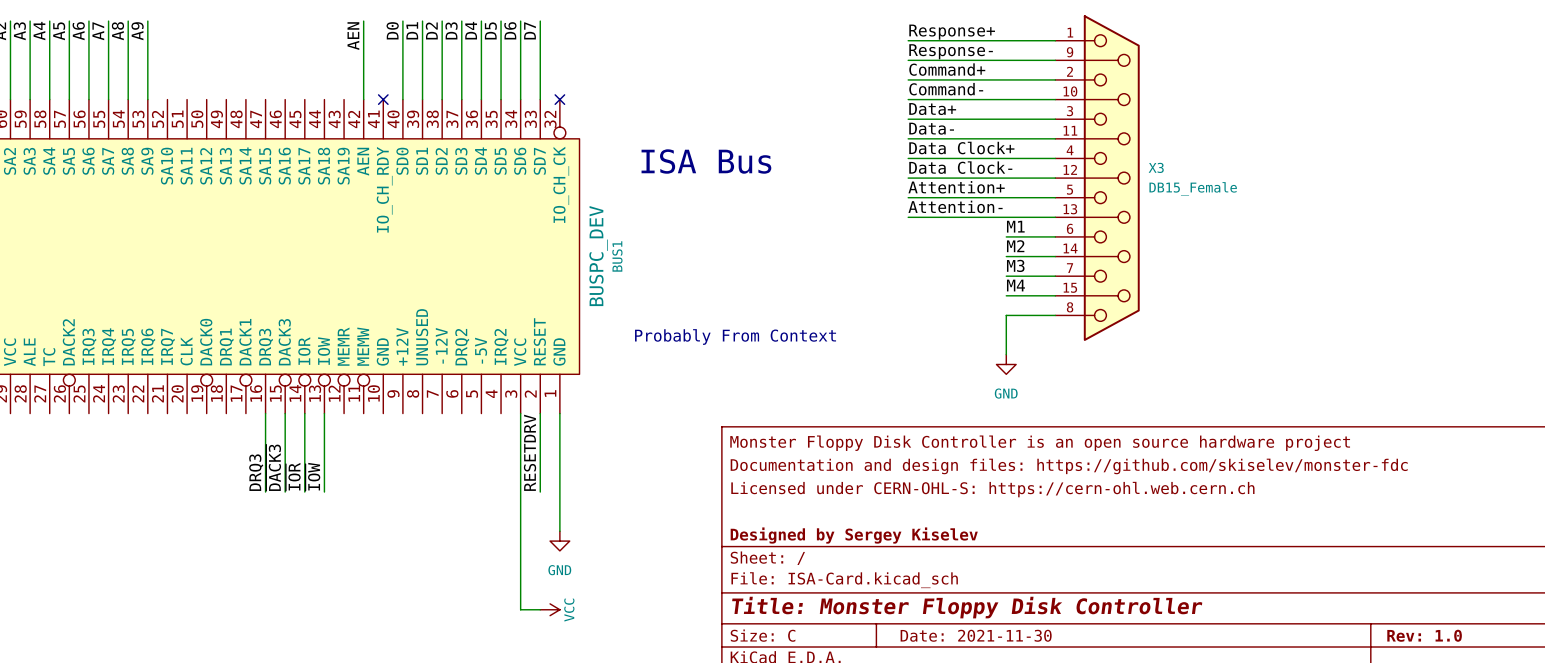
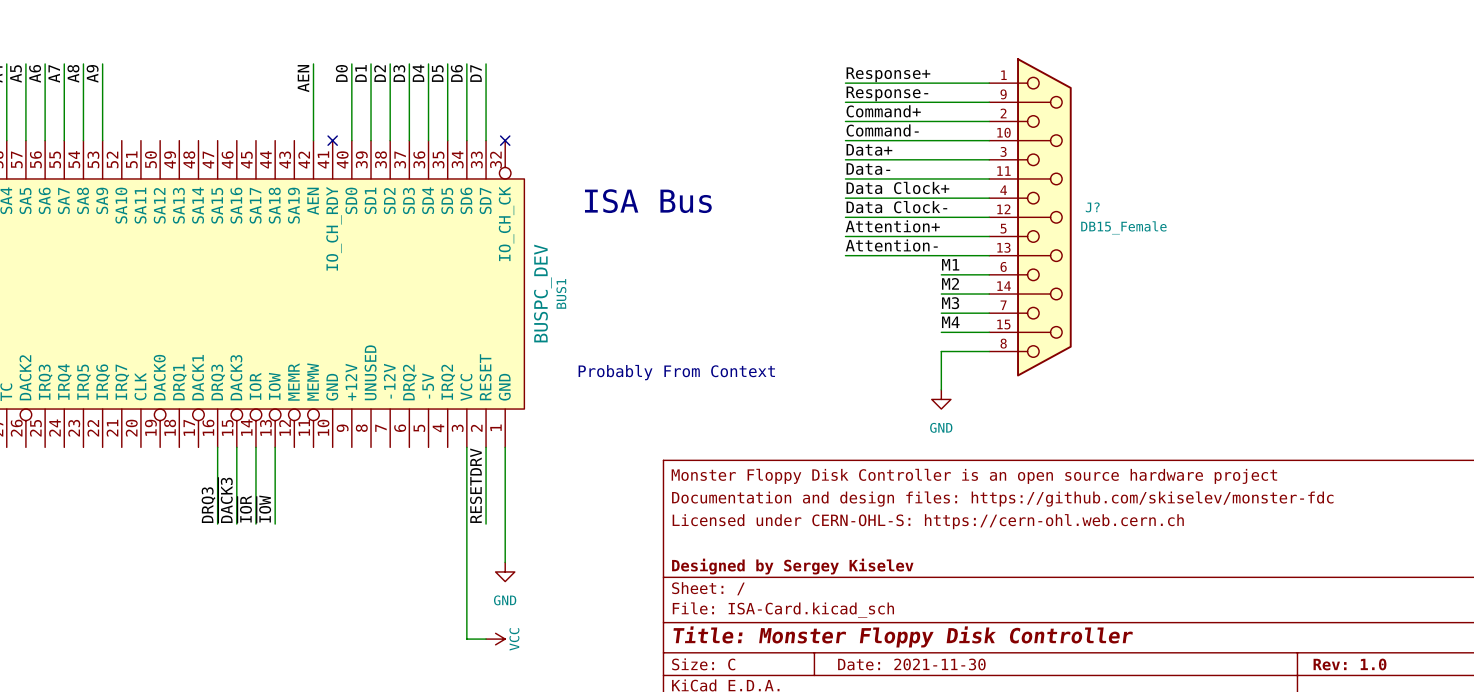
X3 name: X3 (1156, 167) -> J? (1092, 207)

